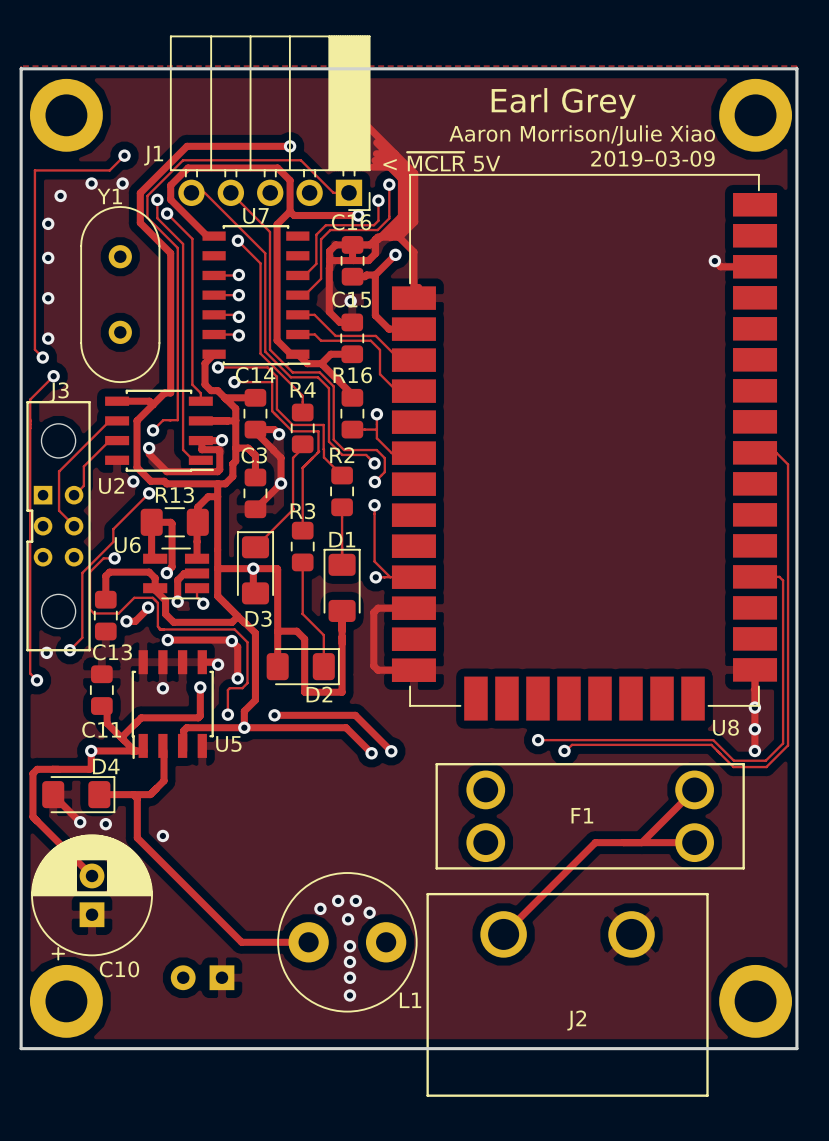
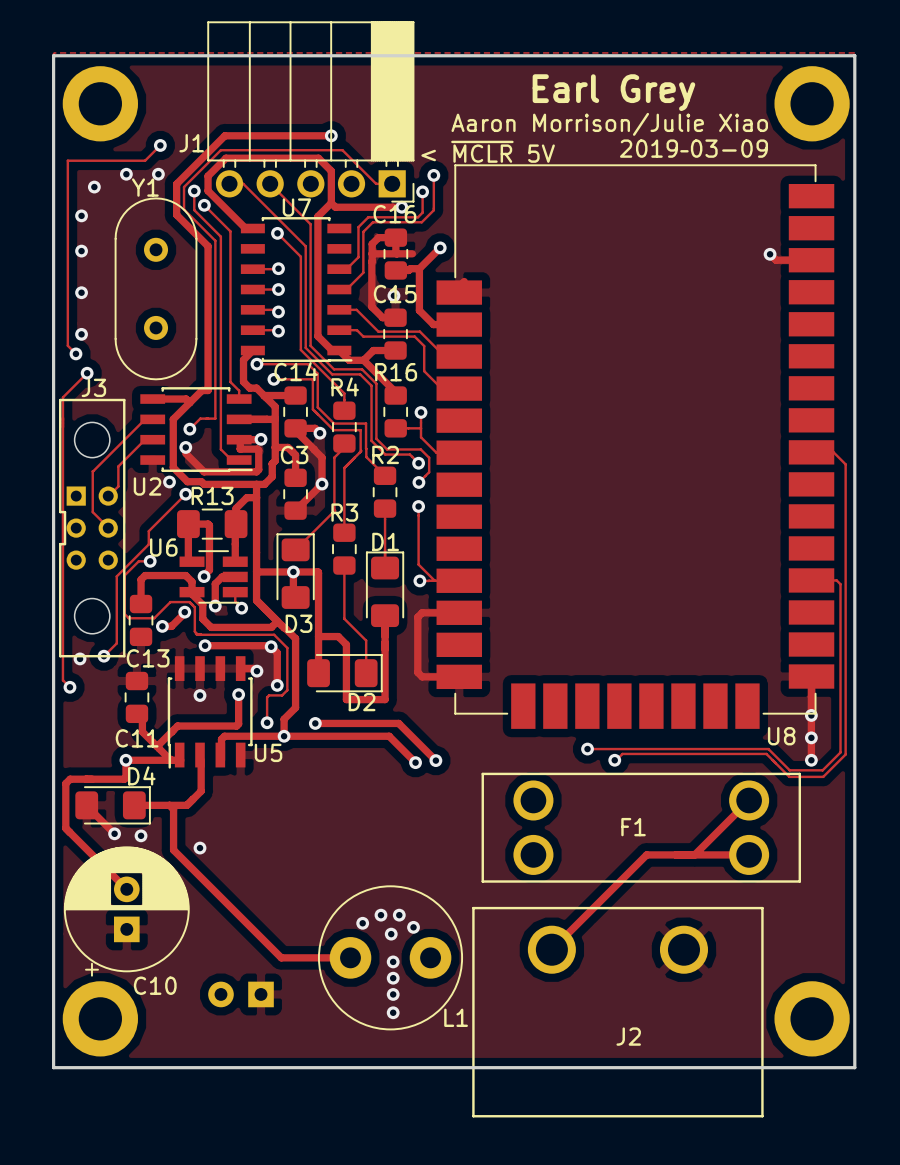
track: (366, 125) (414, 173) (414, 221) (399, 237) (377, 237) (370, 244) (352, 244) -> none
track: (376, 142) (387, 153) -> none
track: (376, 153) (395, 153) -> none
track: (375, 160) (392, 160) (408, 176) (408, 219) (390, 236) -> none
track: (372, 167) (389, 167) (401, 178) (401, 216) (378, 239) (375, 239) (375, 253) (368, 260) -> none
track: (399, 237) (413, 252) (413, 292) -> none

